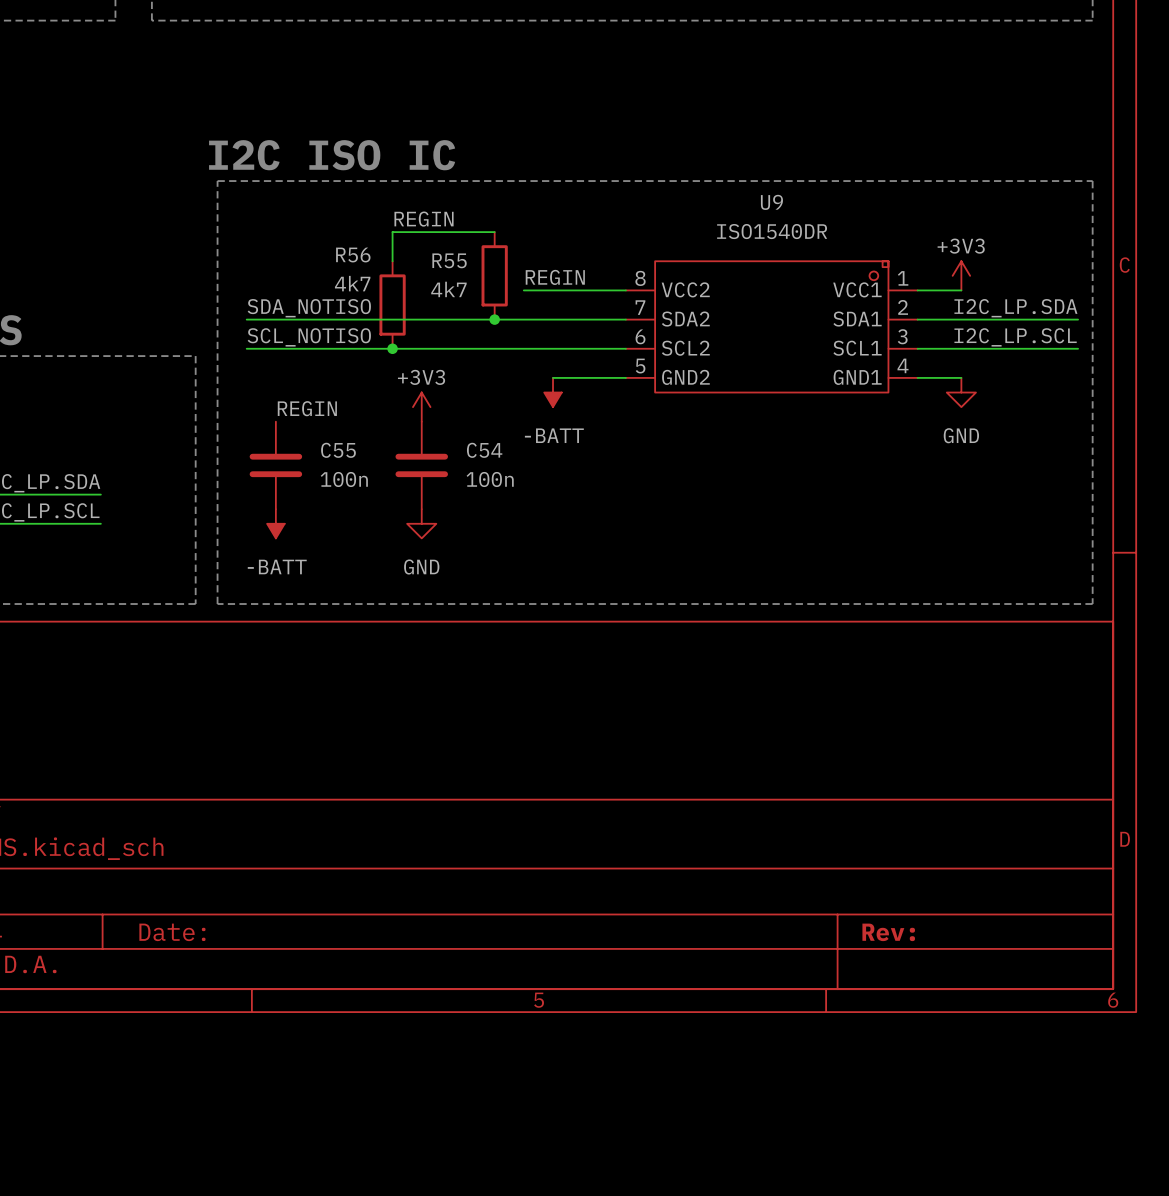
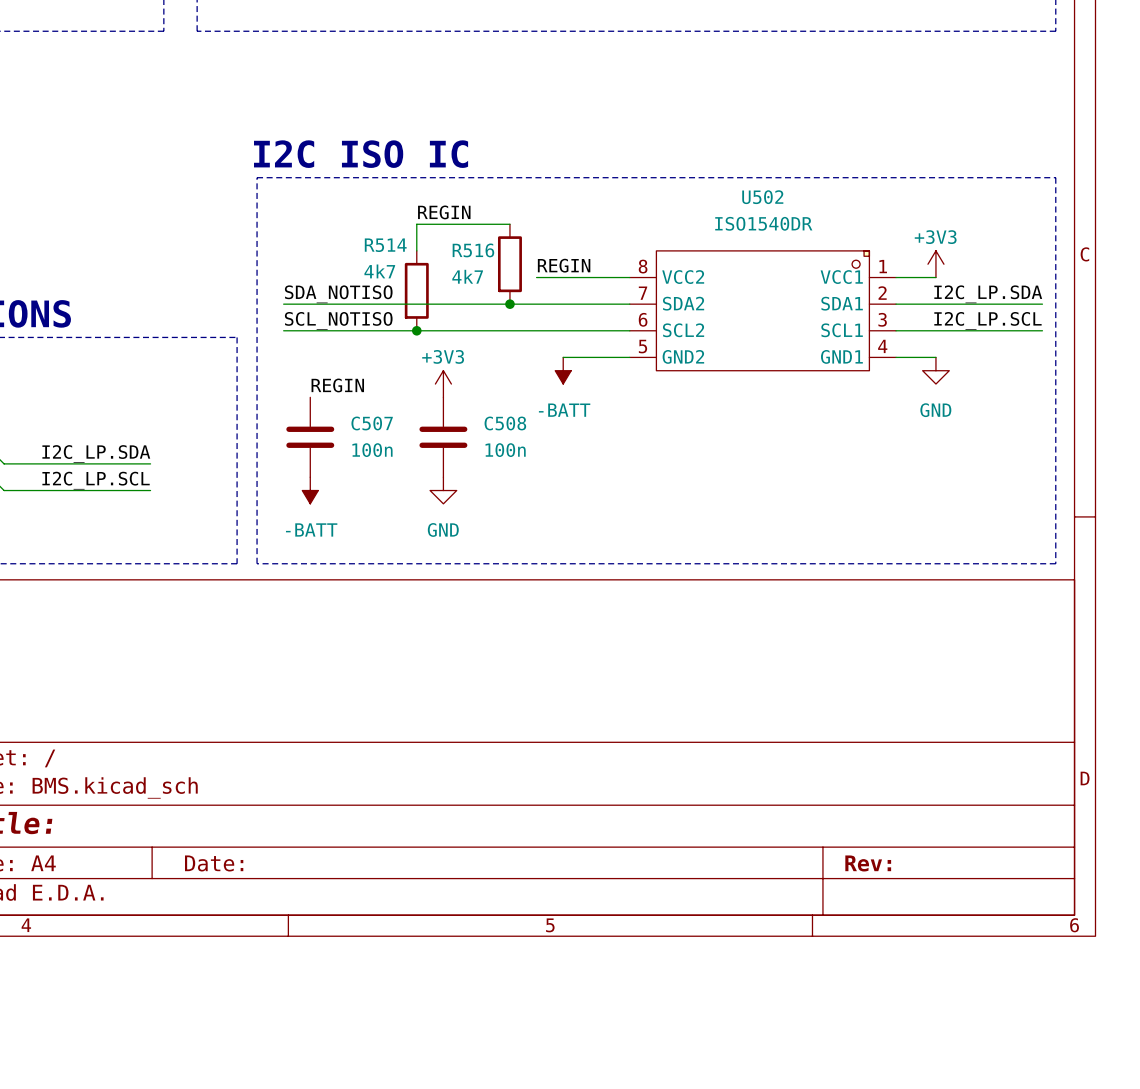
U9 name: U9 (771, 202) -> U502 (762, 197)
R56 name: R56 (353, 255) -> R514 (385, 245)
R55 name: R55 (449, 260) -> R516 (473, 250)
C55 name: C55 (338, 450) -> C507 (372, 423)
C54 name: C54 (484, 450) -> C508 (505, 423)

